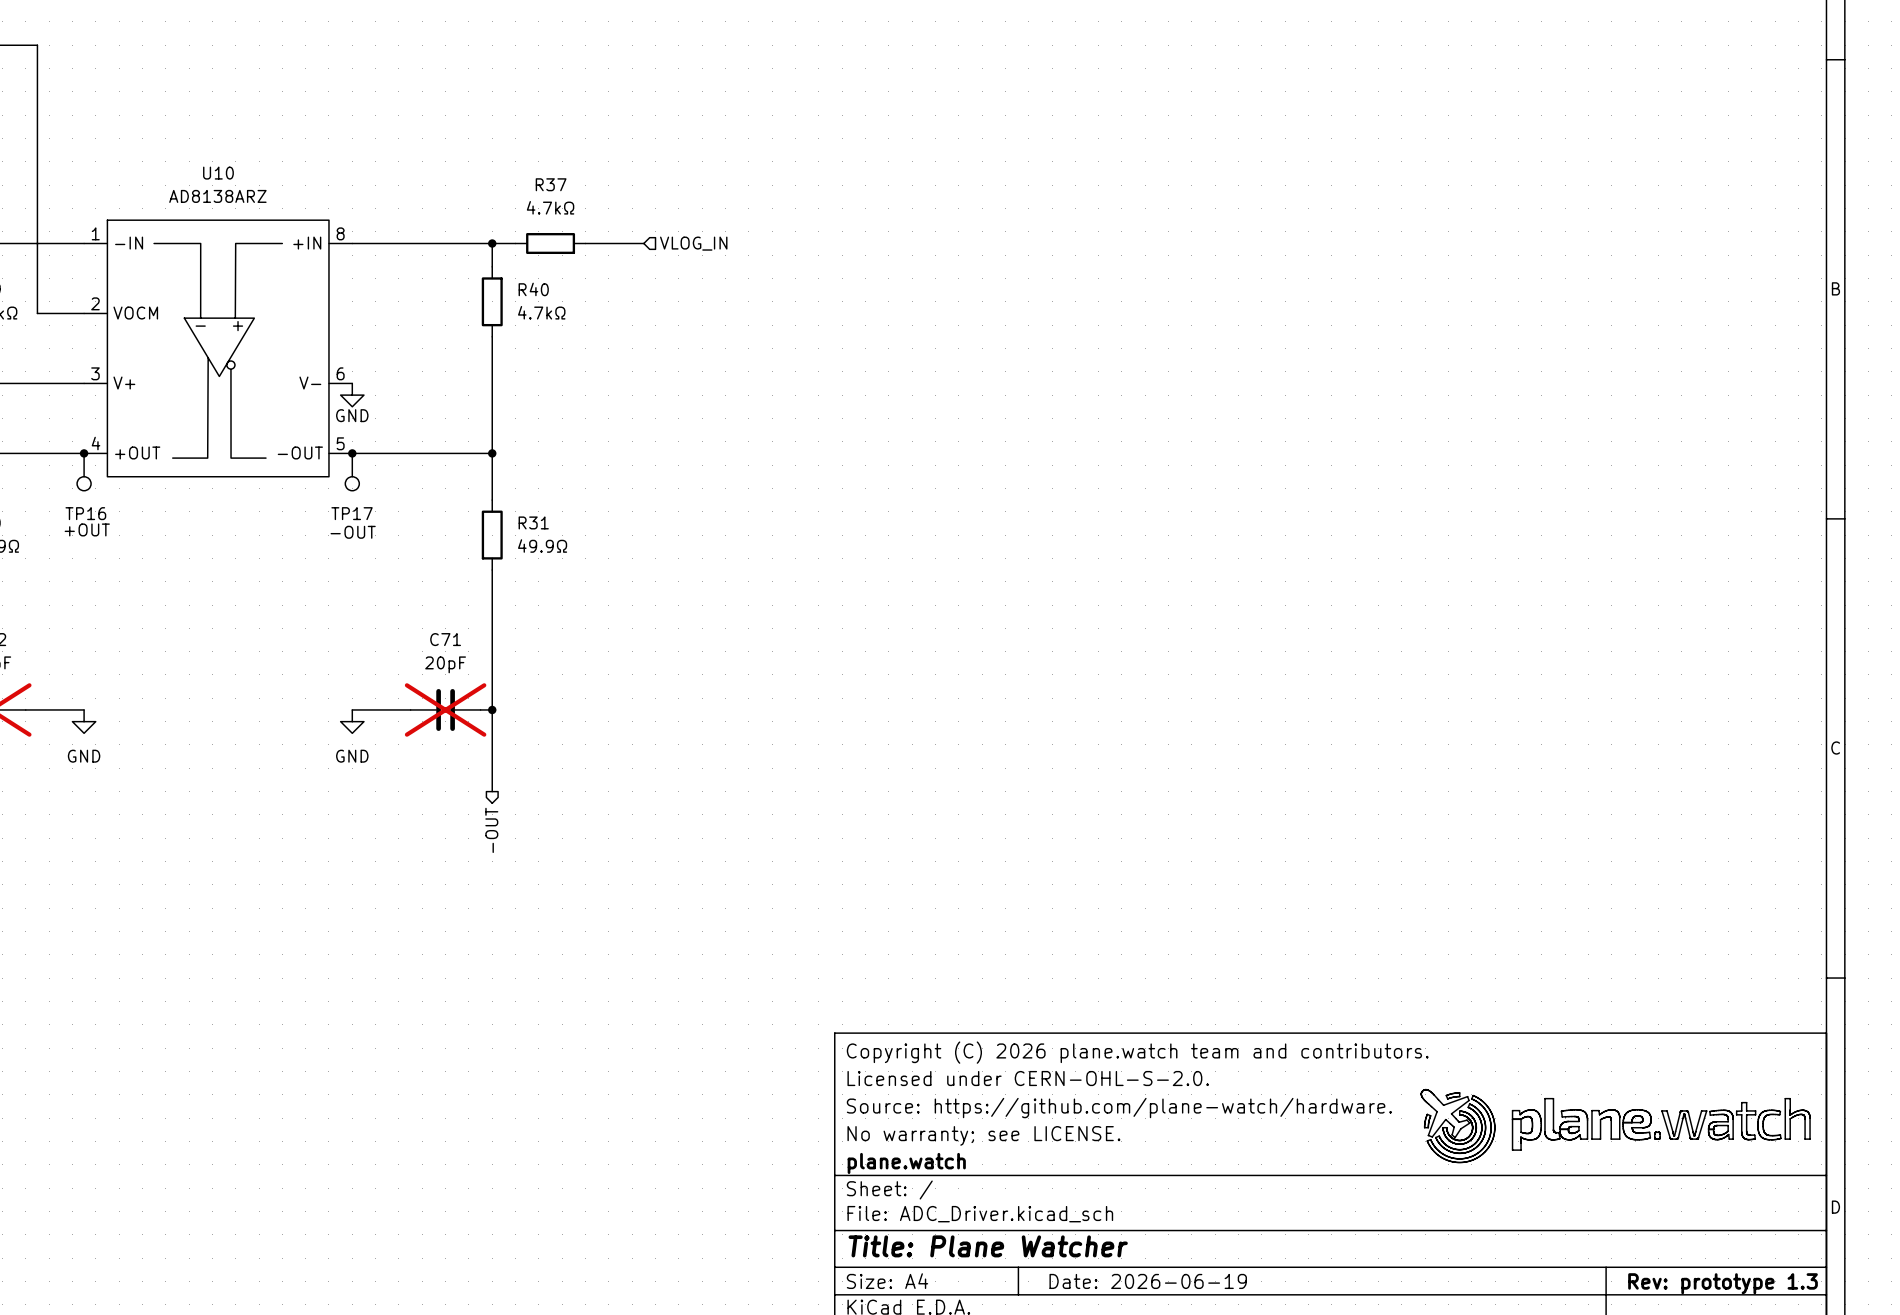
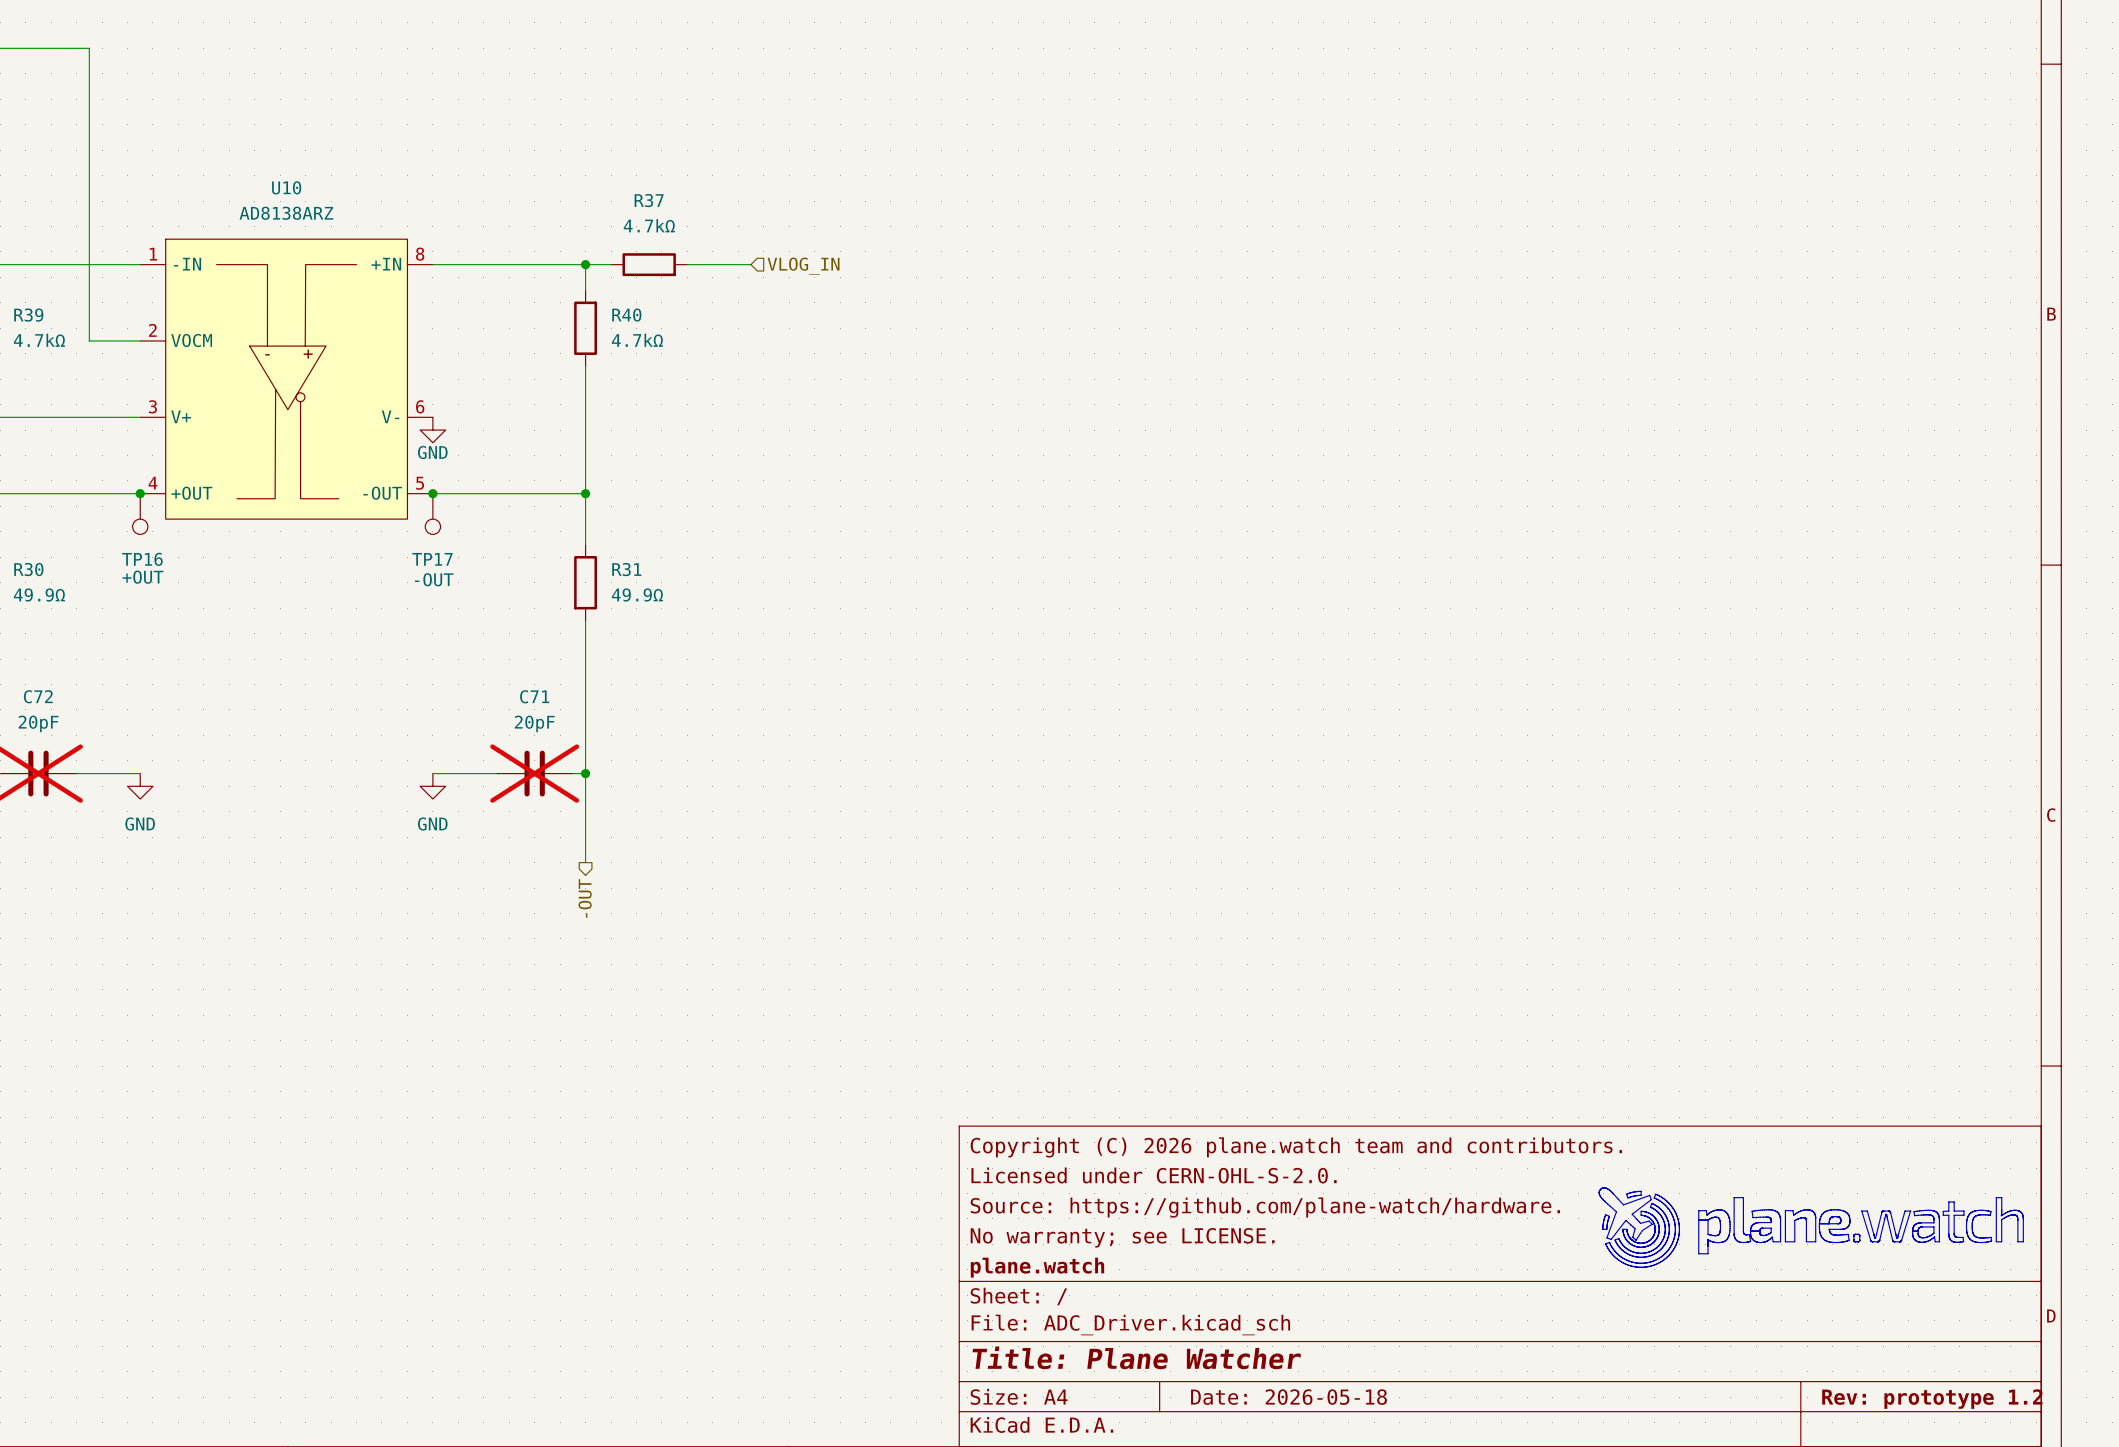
title block: Date: 2026-06-19 (1148, 1281) -> Date: 2026-05-18 (1288, 1397)
title block: Rev: prototype 1.3 (1723, 1283) -> Rev: prototype 1.2 (1932, 1399)

